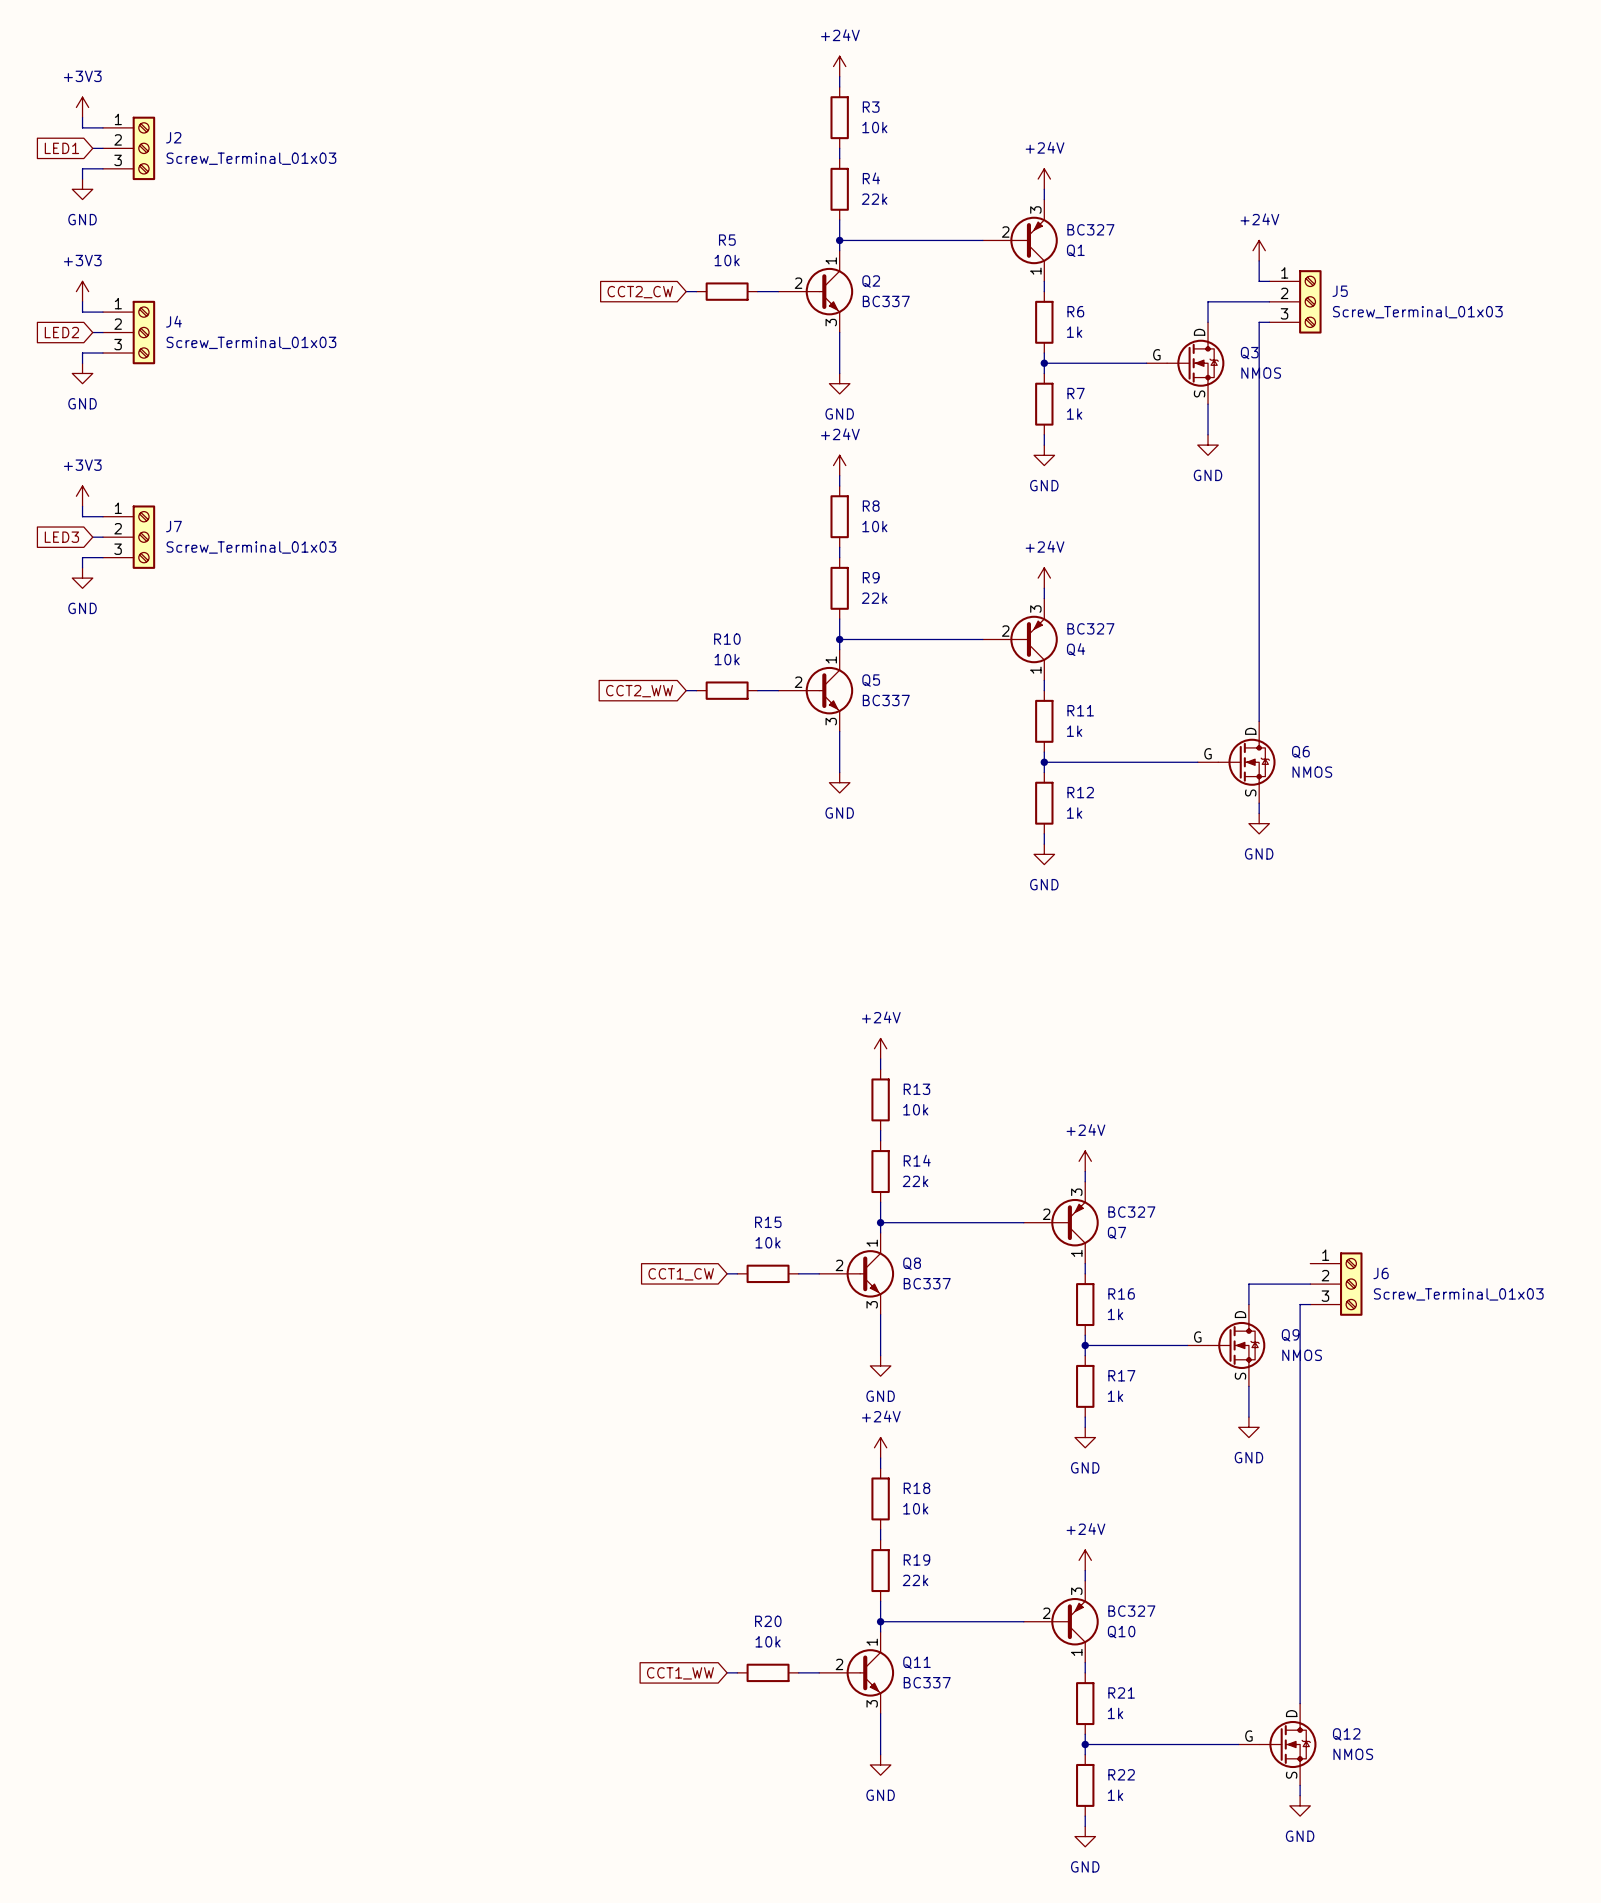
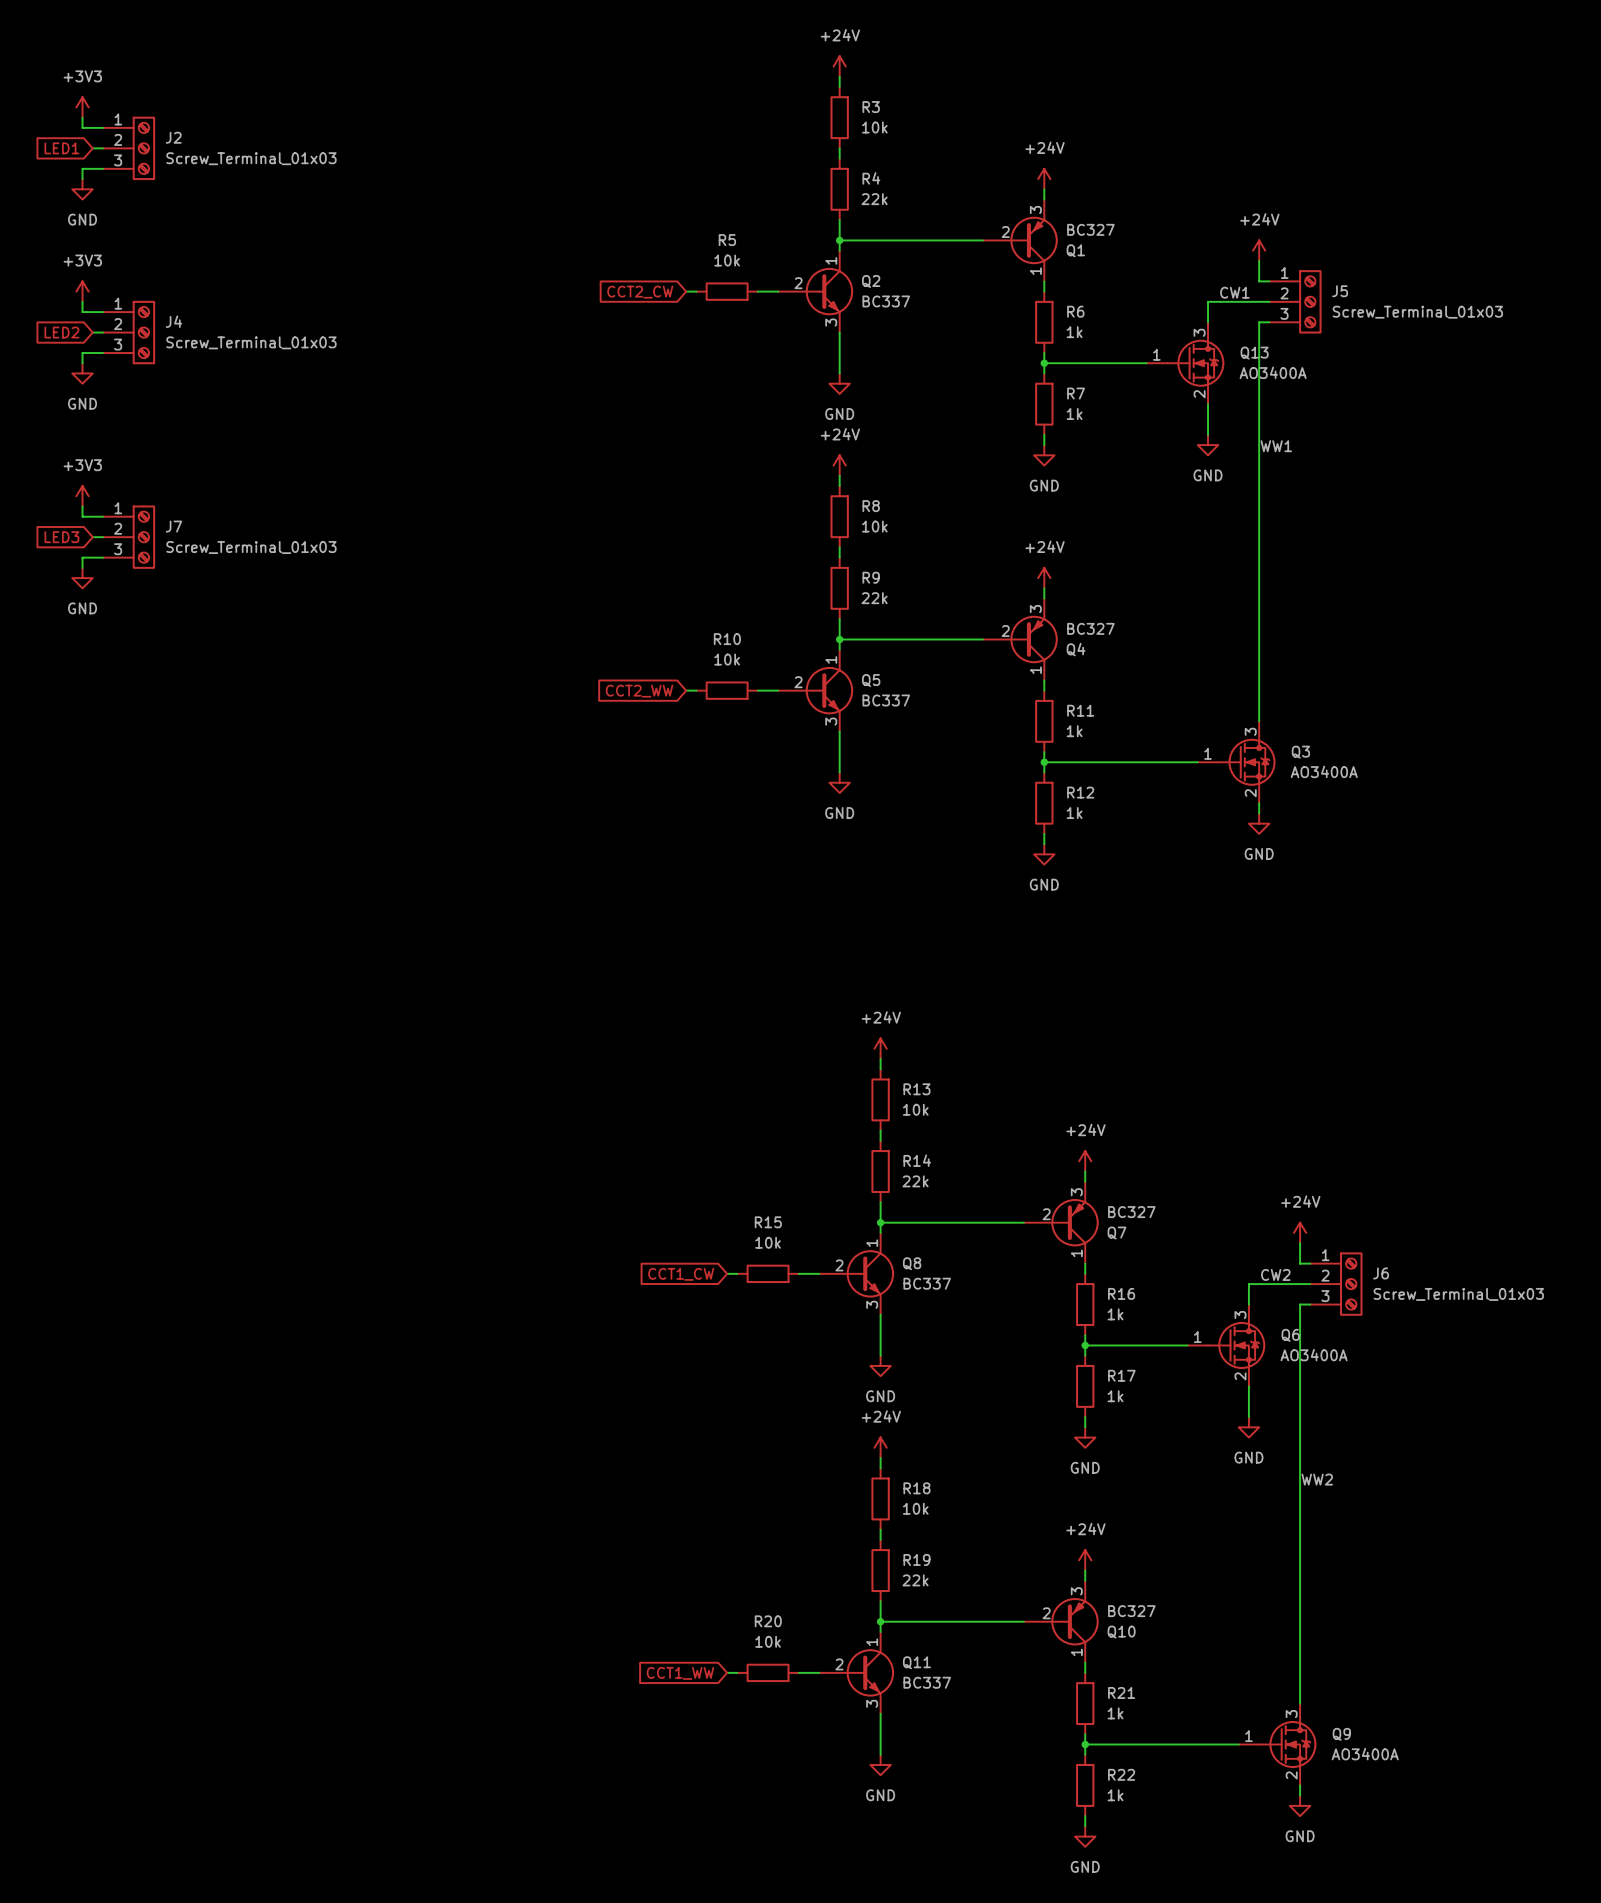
label: none -> CW1 (1234, 292)
Q3 pin name: D (1199, 332) -> none
Q3 pin name: G (1156, 354) -> none
Q3 position: (1185, 363) -> (1236, 762)
Q13: none -> AO3400A (1185, 363)
Q3 value: NMOS (1261, 373) -> AO3400A (1324, 771)
Q3 pin name: S (1199, 393) -> none
label: none -> WW1 (1276, 446)
Q6 pin name: D (1250, 731) -> none
Q3 pin number: none -> 3 (1250, 731)
Q6 pin name: G (1208, 753) -> none
Q3 pin number: none -> 1 (1208, 753)
Q6 position: (1236, 762) -> (1226, 1345)
Q6 value: NMOS (1312, 772) -> AO3400A (1314, 1355)
Q6 pin name: S (1250, 792) -> none
Q3 pin number: none -> 2 (1250, 793)
power symbol: none -> +24V (1300, 1232)
wire: none -> (1300, 1243) (1300, 1263) (1310, 1263)
label: none -> CW2 (1275, 1274)
Q9 pin name: D (1240, 1314) -> none
Q6 pin number: none -> 3 (1240, 1315)
Q6 pin number: none -> 1 (1197, 1337)
Q9 pin name: G (1197, 1337) -> none
Q9 position: (1226, 1345) -> (1277, 1744)
Q9 value: NMOS (1302, 1355) -> AO3400A (1365, 1754)
Q6 pin number: none -> 2 (1240, 1376)
Q9 pin name: S (1240, 1376) -> none
label: none -> WW2 (1317, 1479)
Q9 pin number: none -> 3 (1291, 1714)
Q9 pin number: none -> 1 (1248, 1736)
Q12: NMOS (1277, 1744) -> none
Q9 pin number: none -> 2 (1291, 1775)

